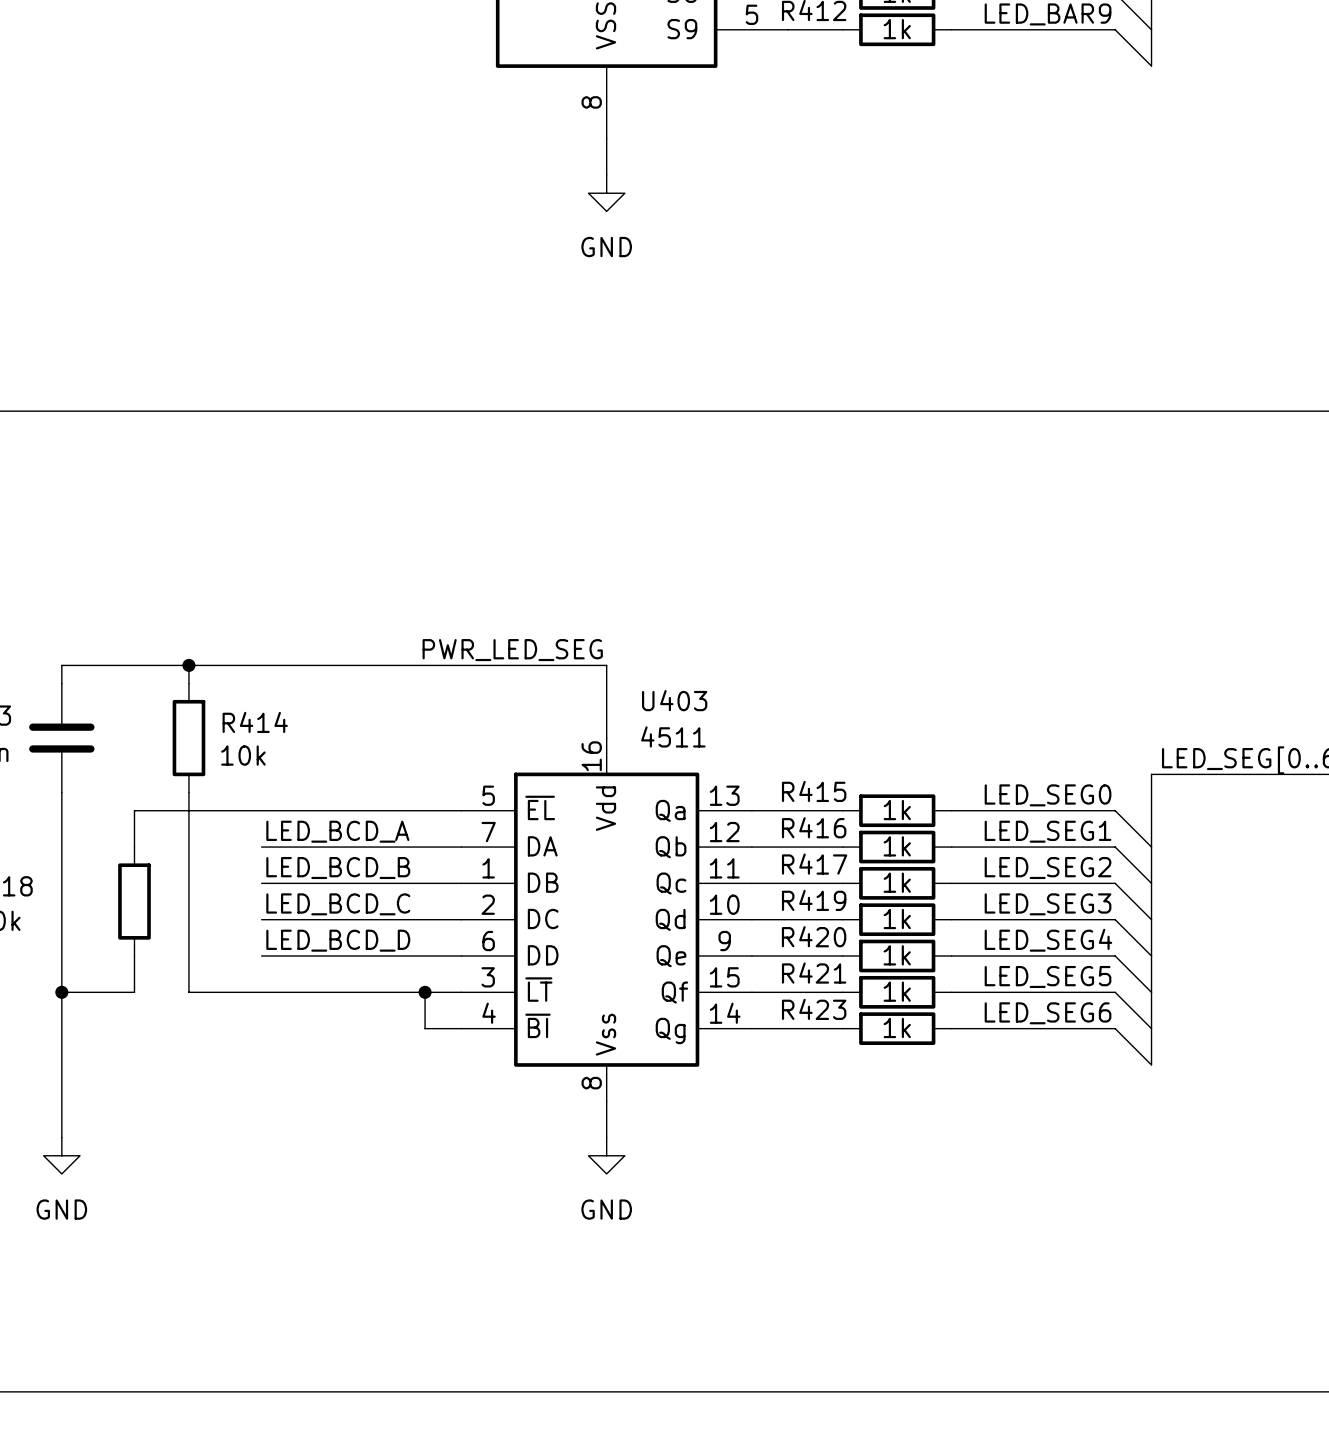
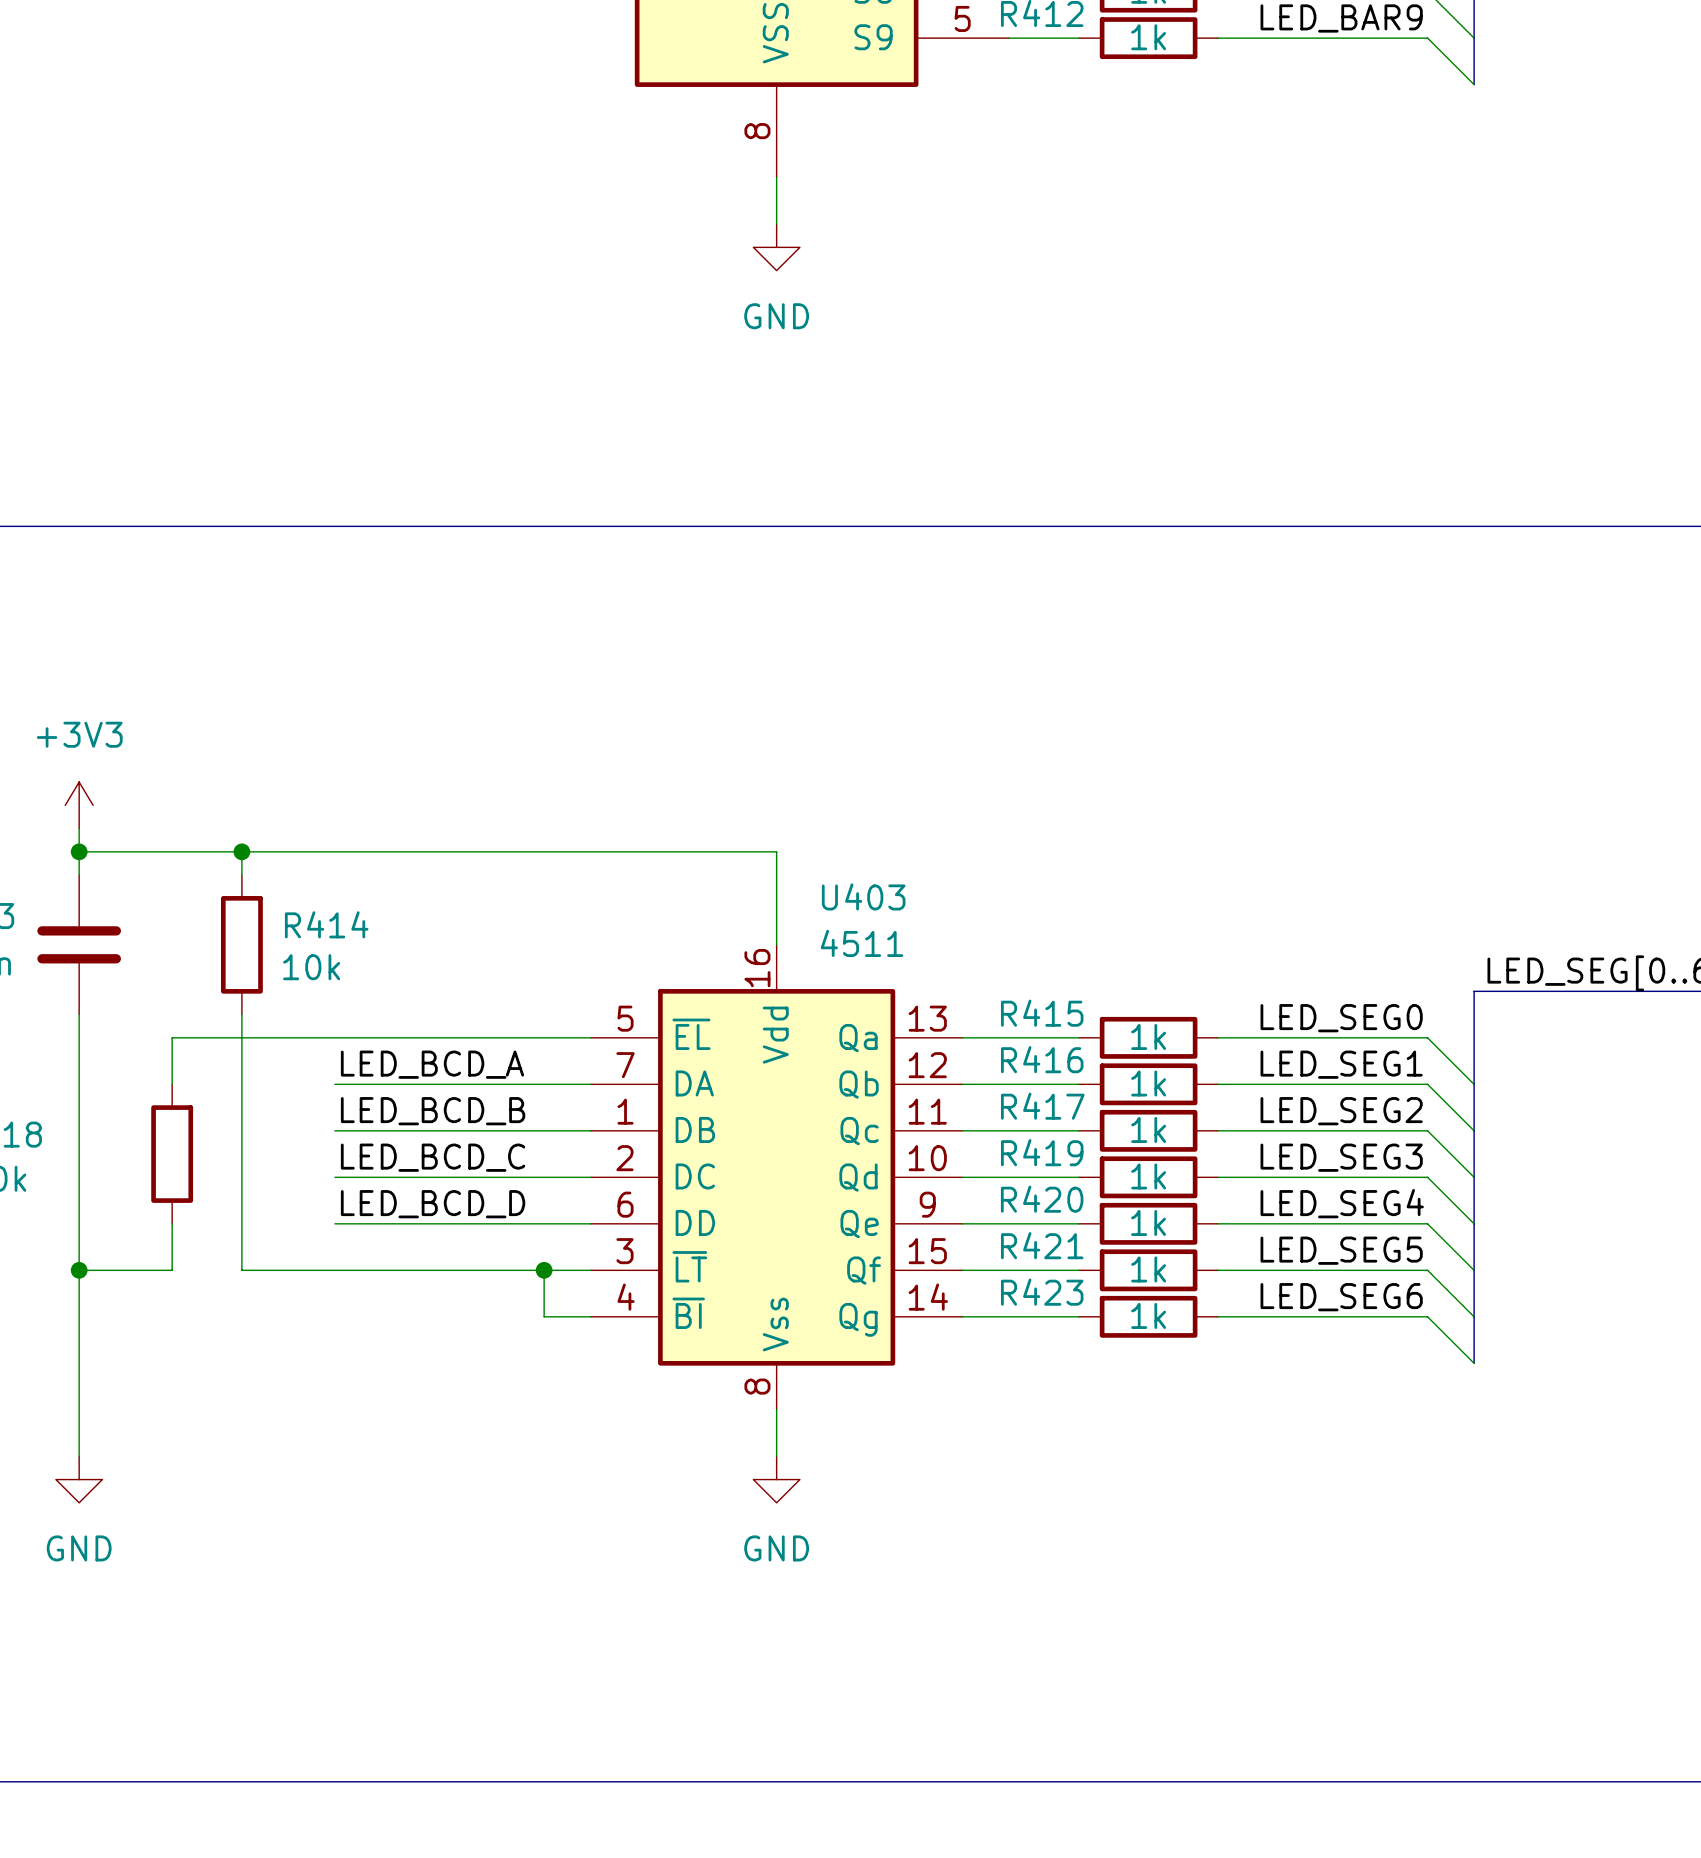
power symbol: none -> +3V3 (79, 805)
wire: none -> (79, 828) (79, 851)
label: PWR_LED_SEG (512, 650) -> none
junction: none -> (79, 851)

